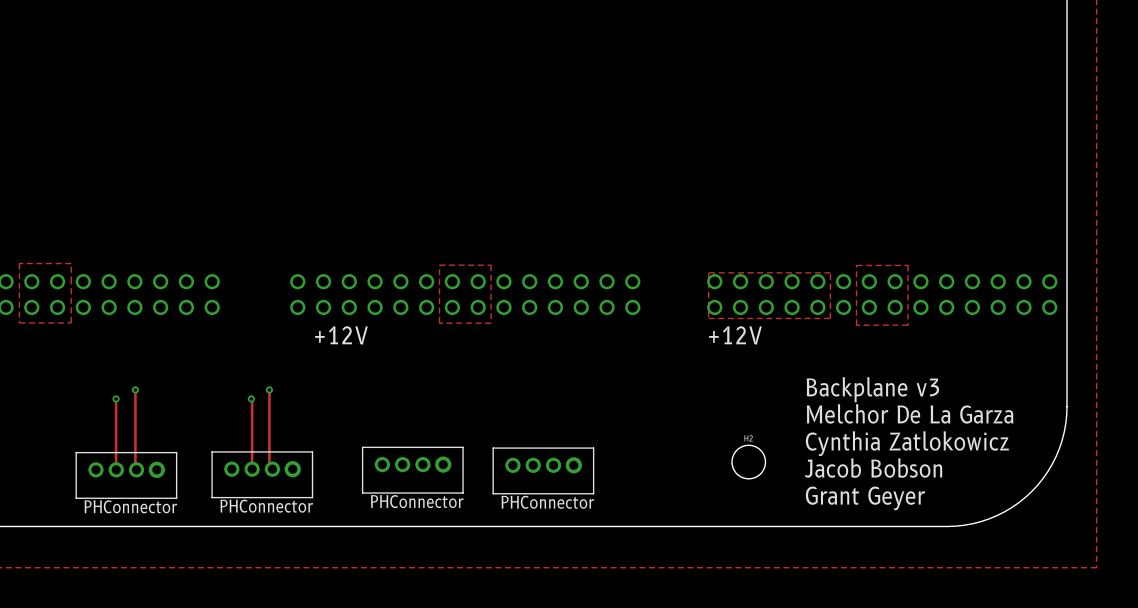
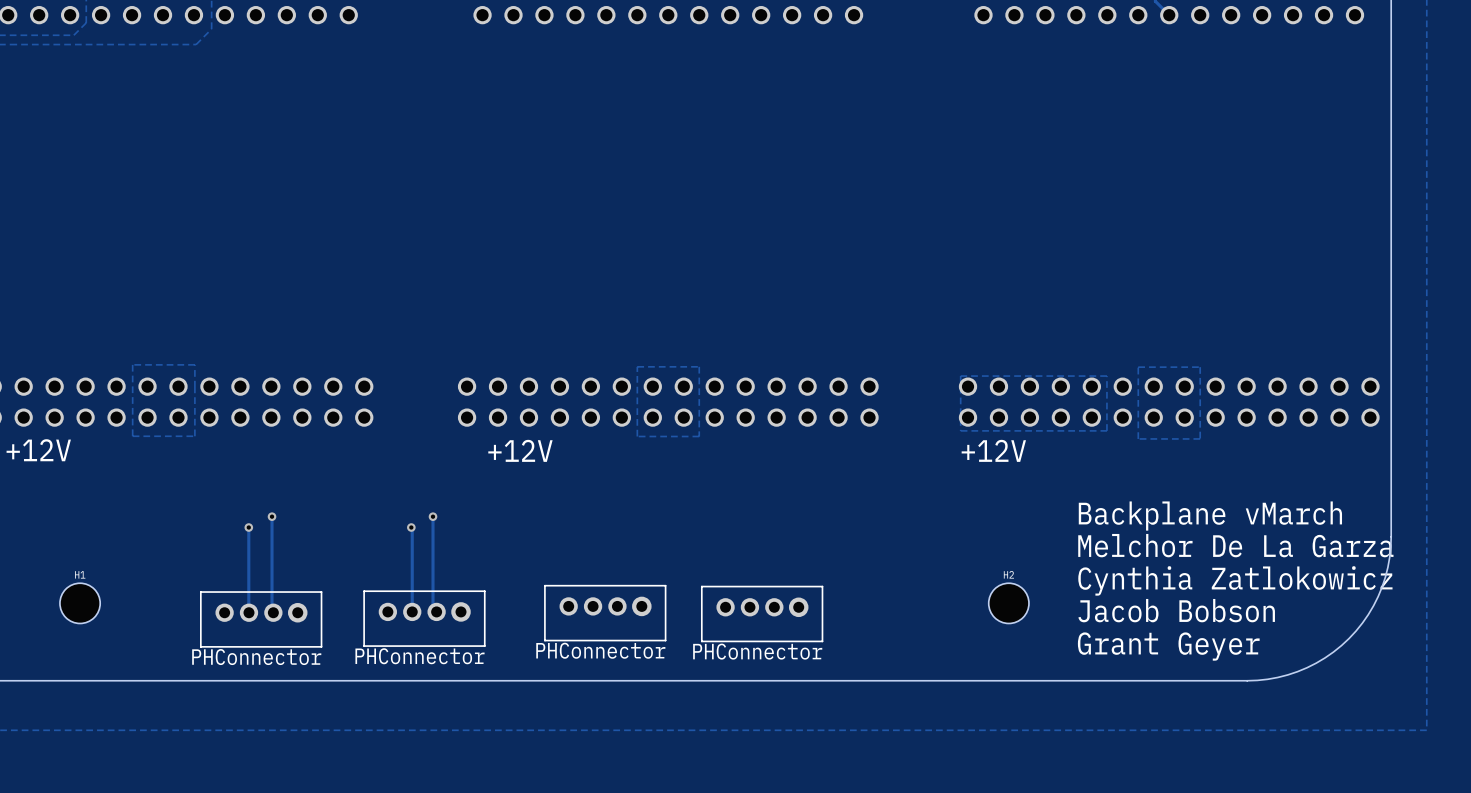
text: Backplane v3 (872, 389) -> Backplane vMarch (1210, 516)

